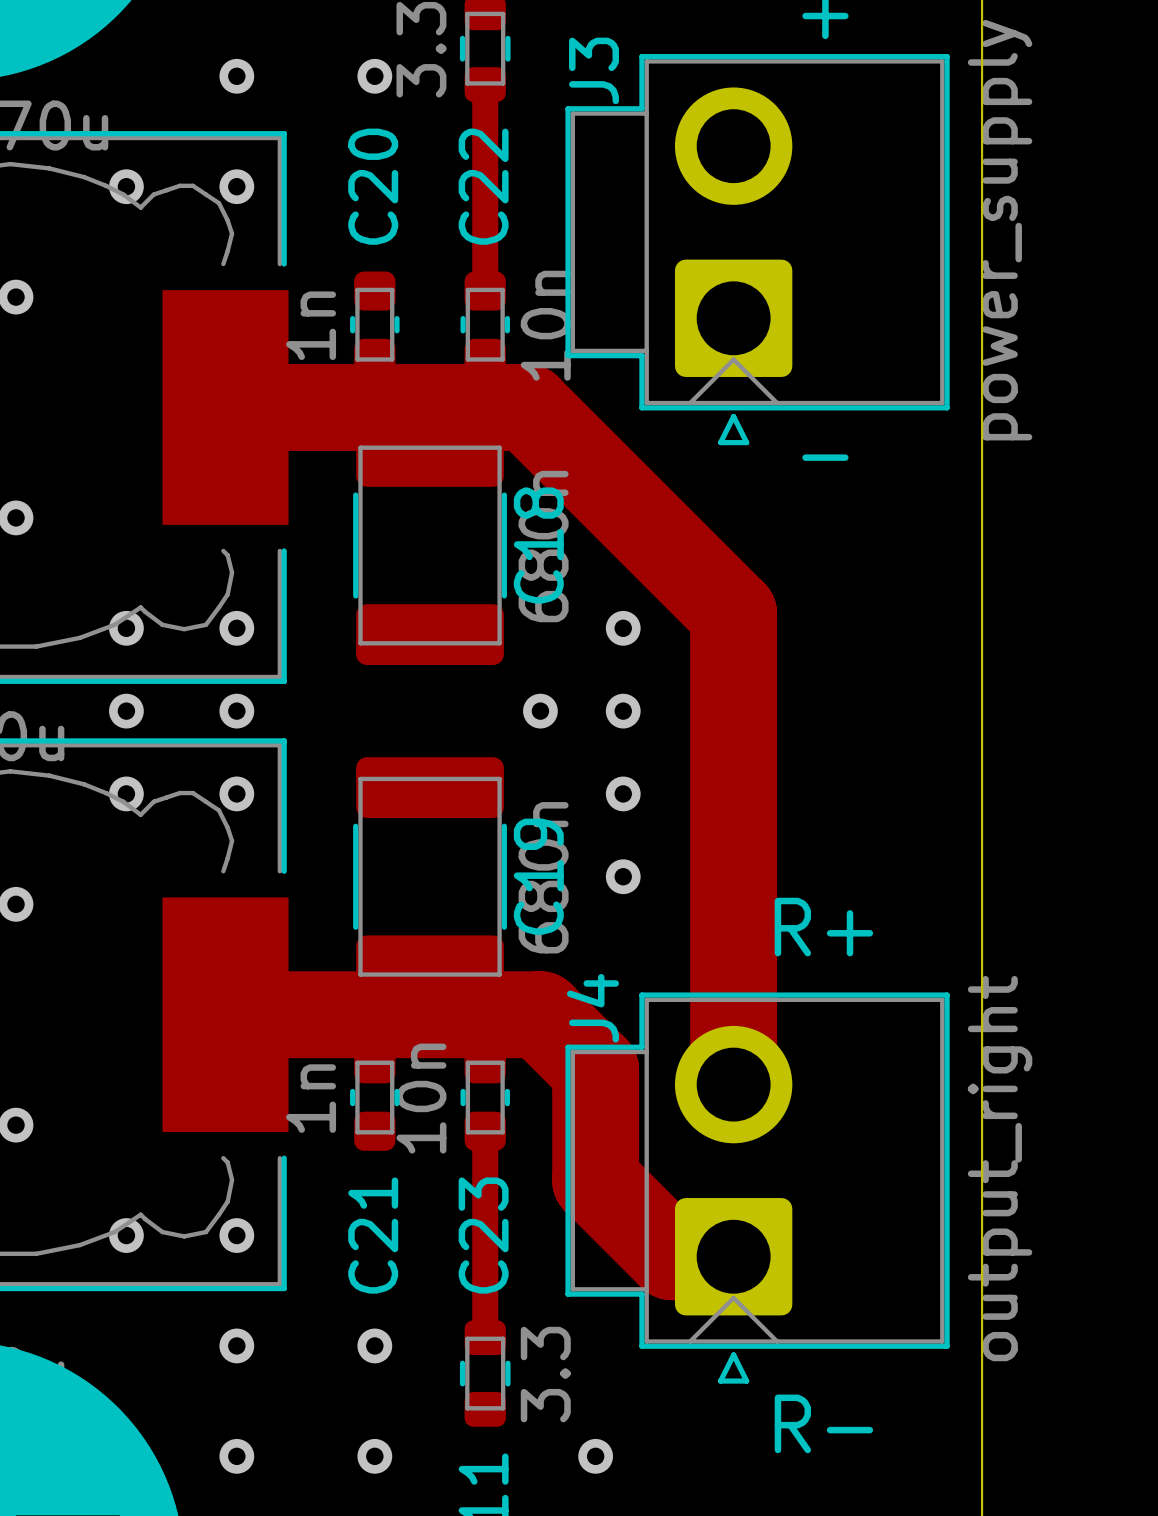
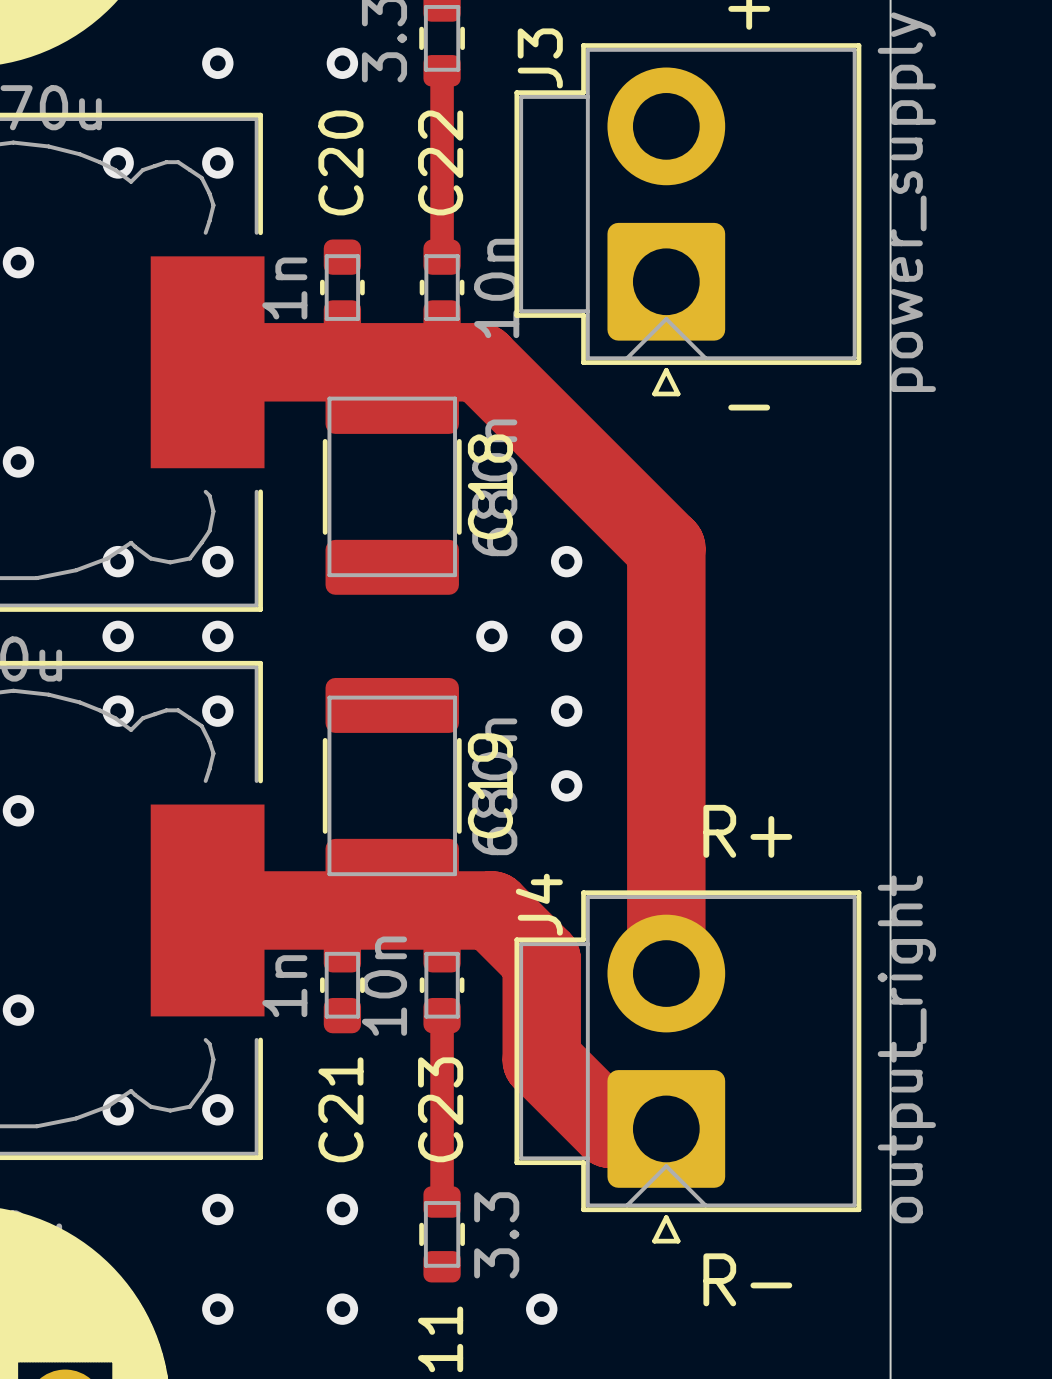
J3 footprint: [565, 54, 950, 446] -> [514, 43, 862, 397]
J4 footprint: [565, 992, 950, 1384] -> [514, 890, 862, 1244]

